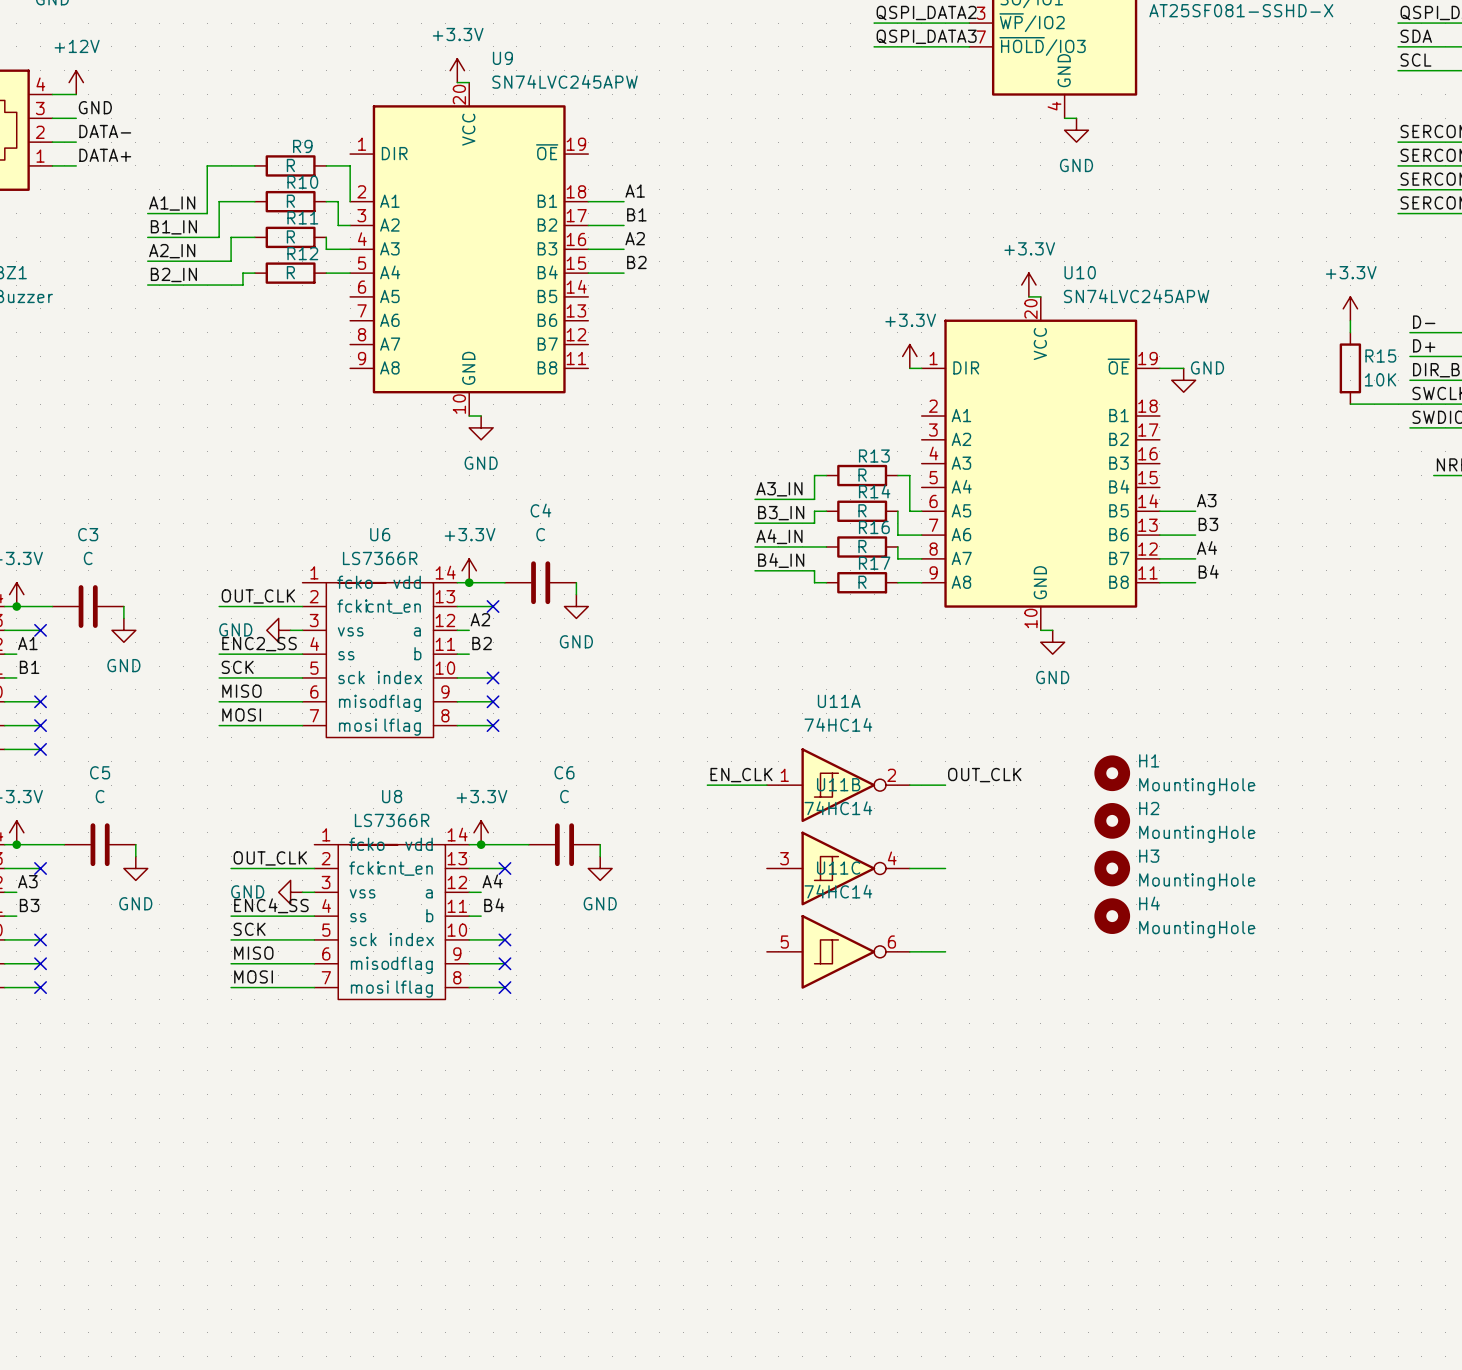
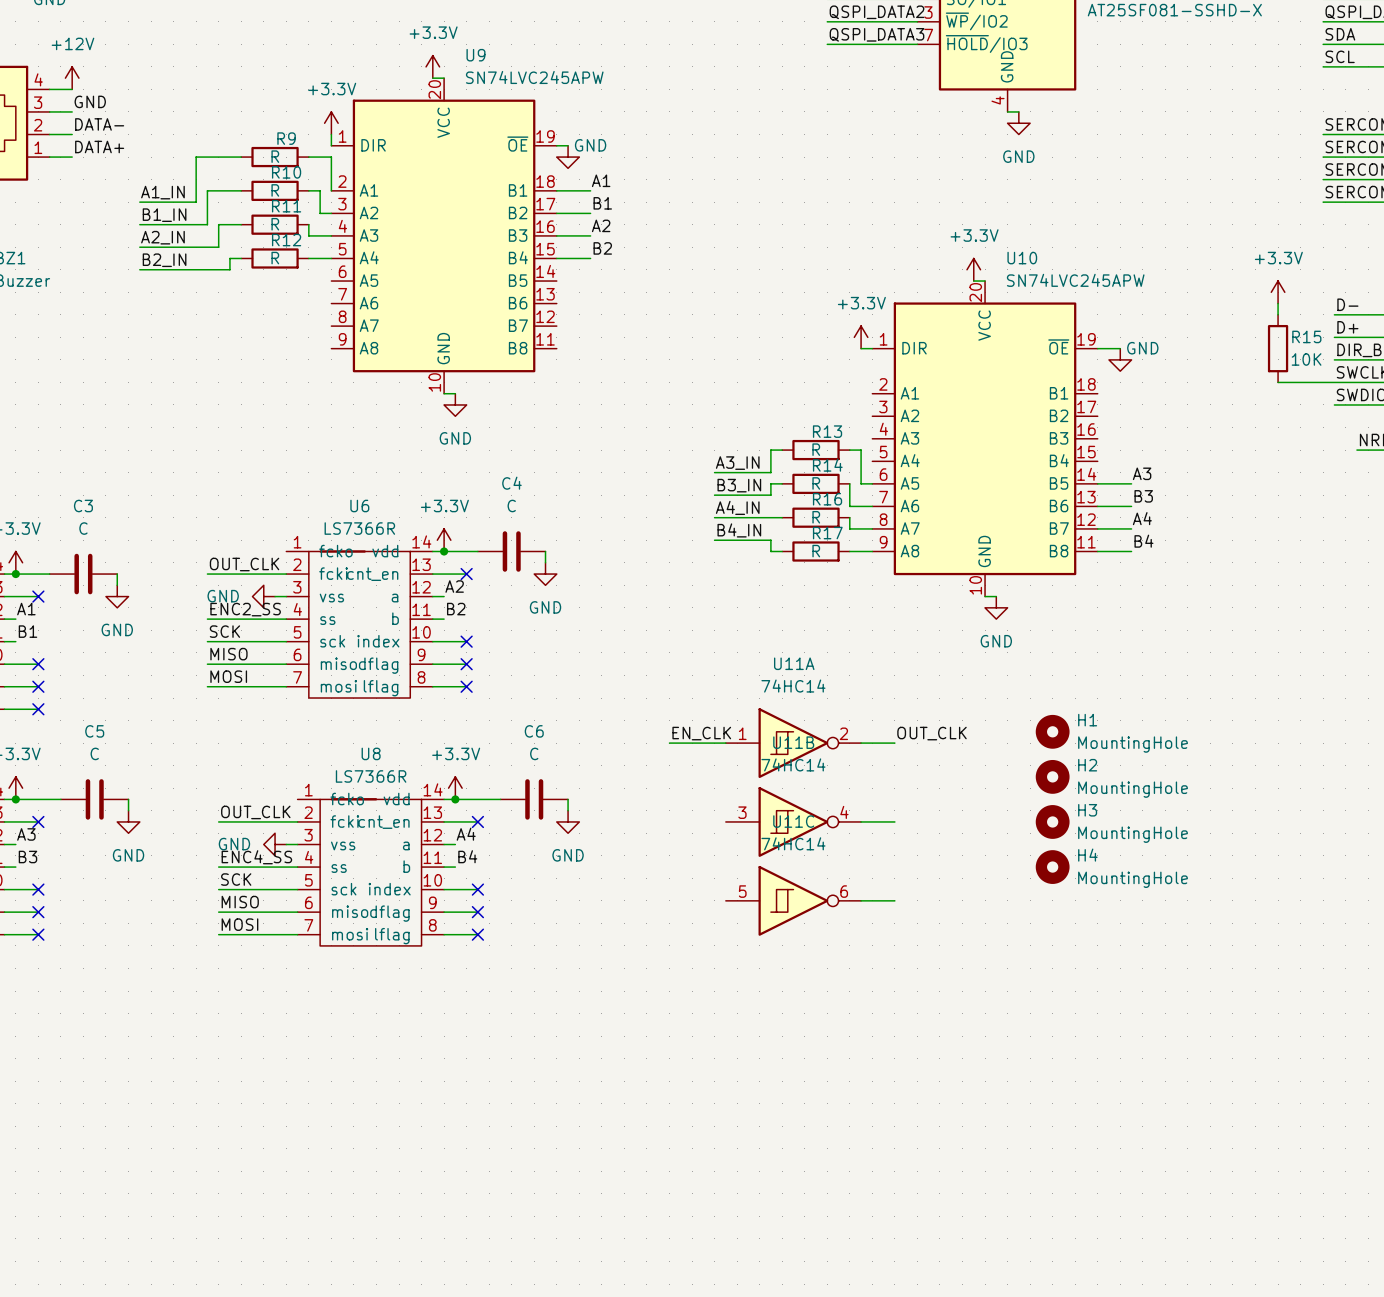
power symbol: none -> +3.3V (331, 123)
wire: none -> (331, 134) (331, 145)
wire: none -> (556, 145) (568, 145)
power symbol: none -> GND (568, 157)

